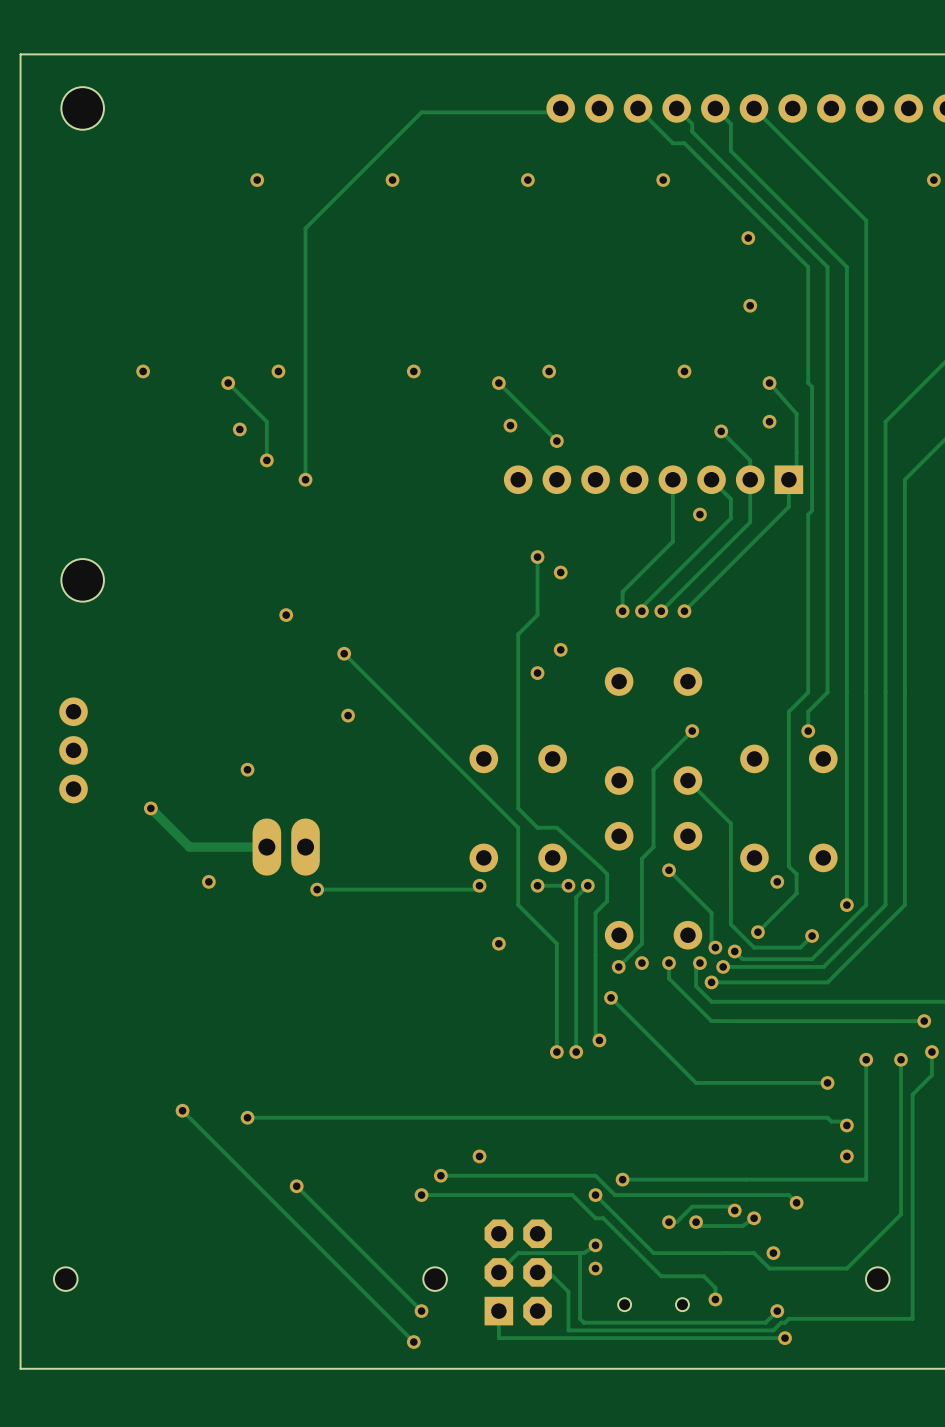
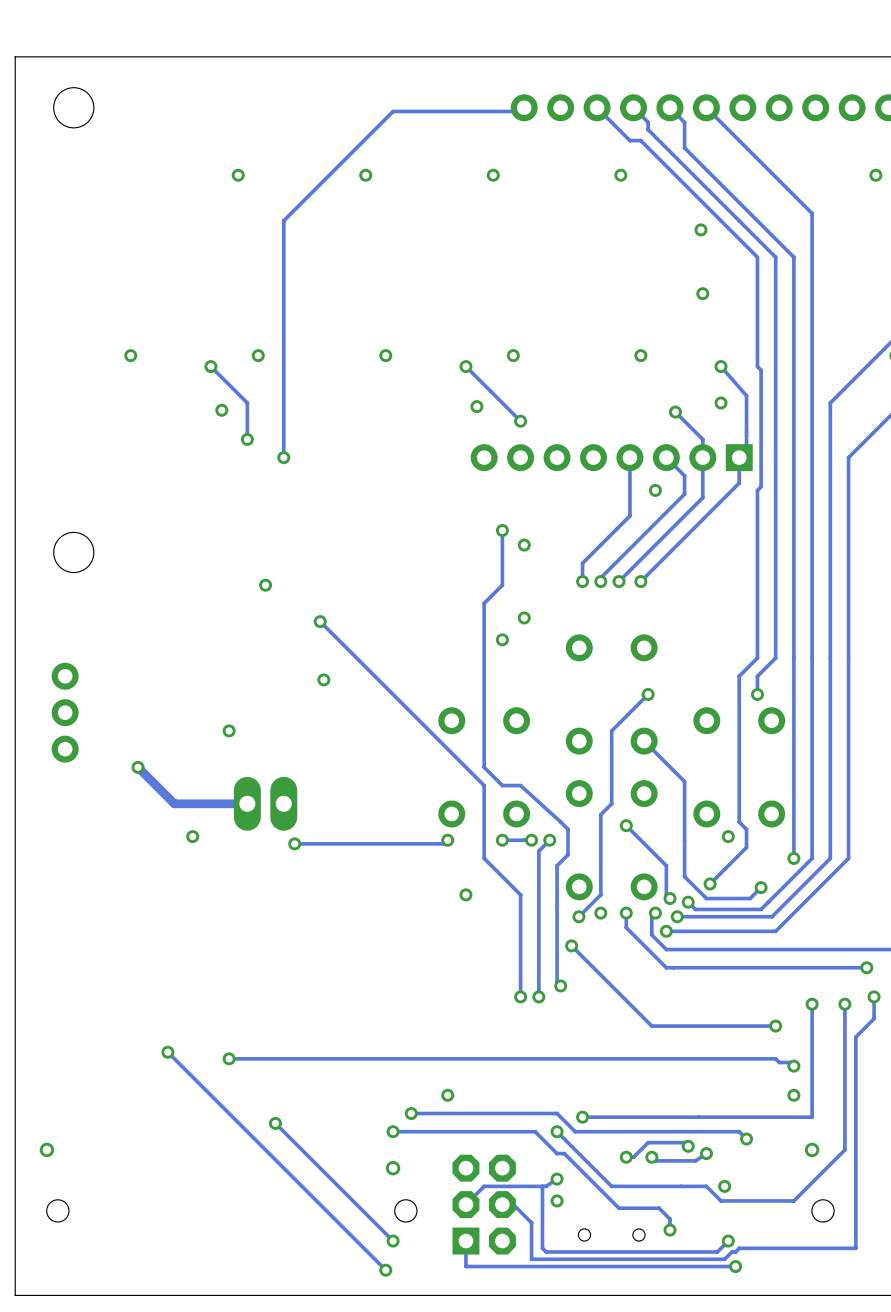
via: none -> (46, 1149)
via: none -> (812, 1149)
via: none -> (393, 1168)

